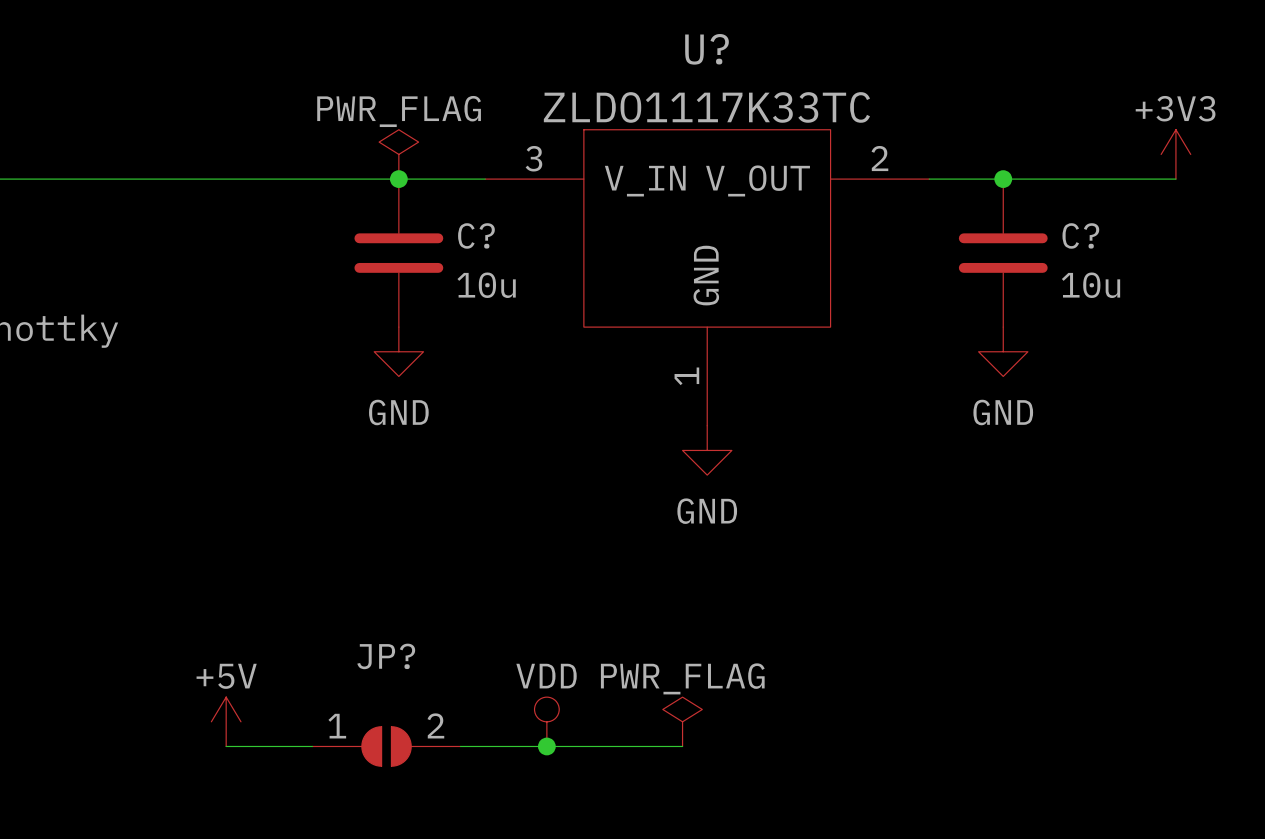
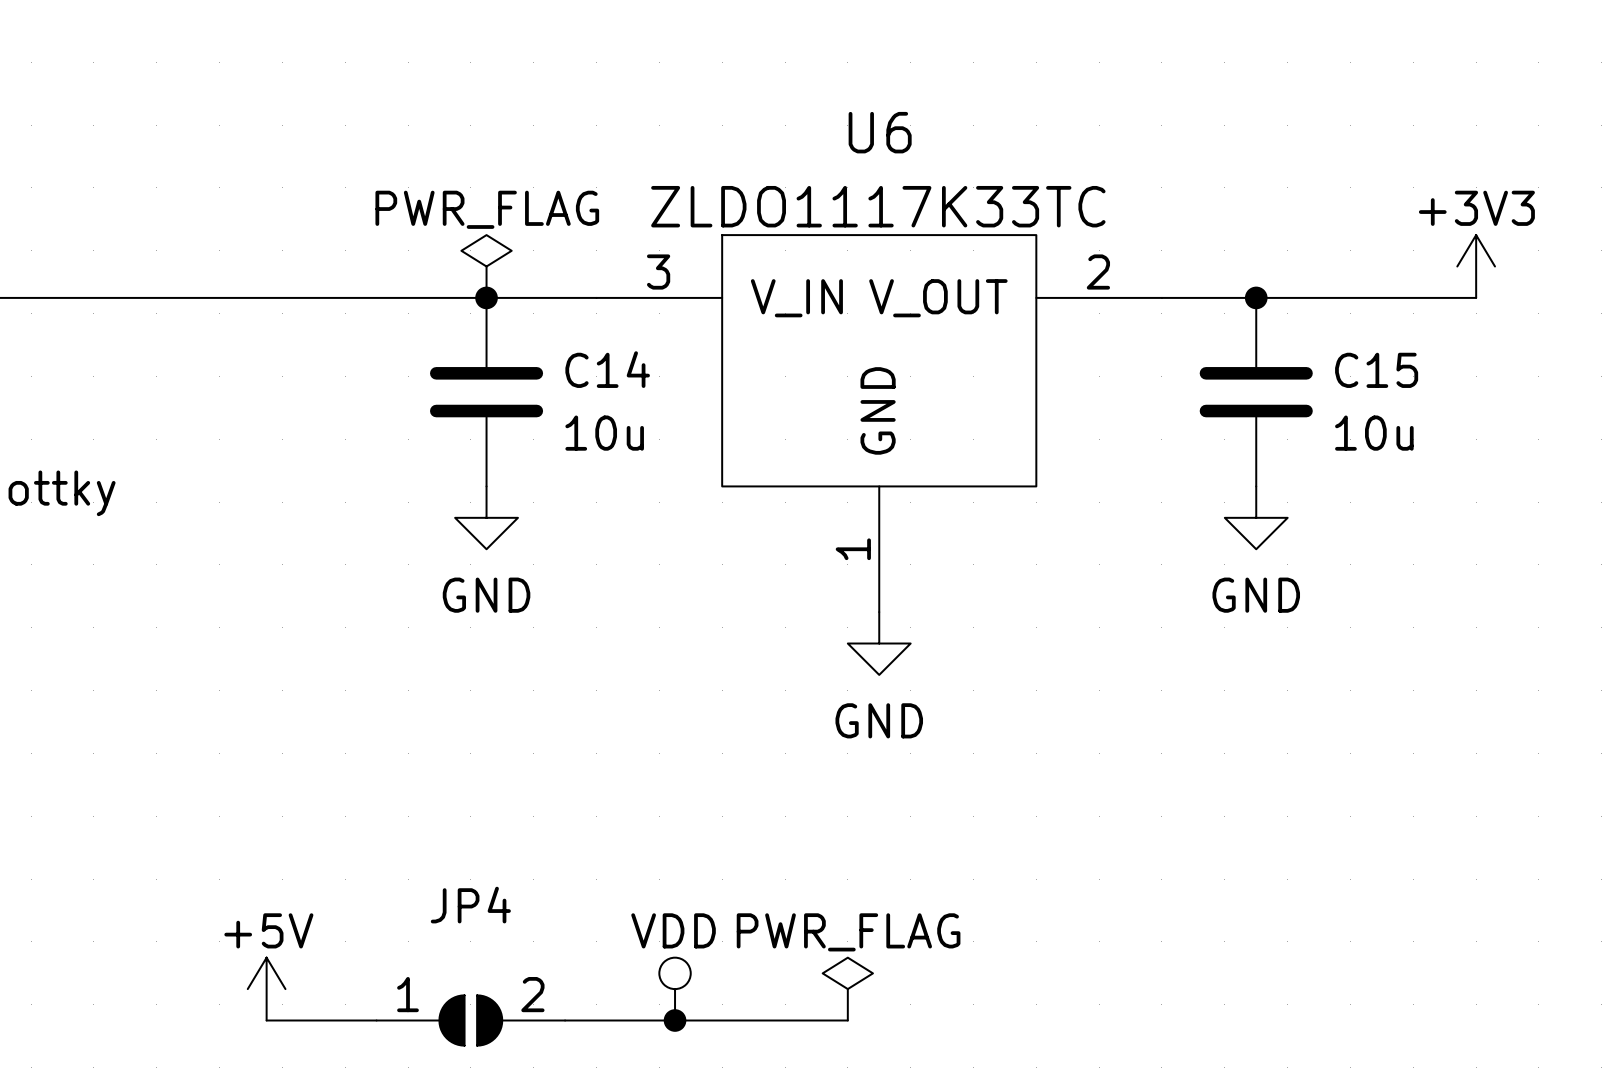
U? name: U? (707, 49) -> U6 (880, 132)
C? name: C? (476, 235) -> C14 (607, 369)
C? name: C? (1080, 235) -> C15 (1376, 370)
JP? name: JP? (386, 656) -> JP4 (470, 905)

